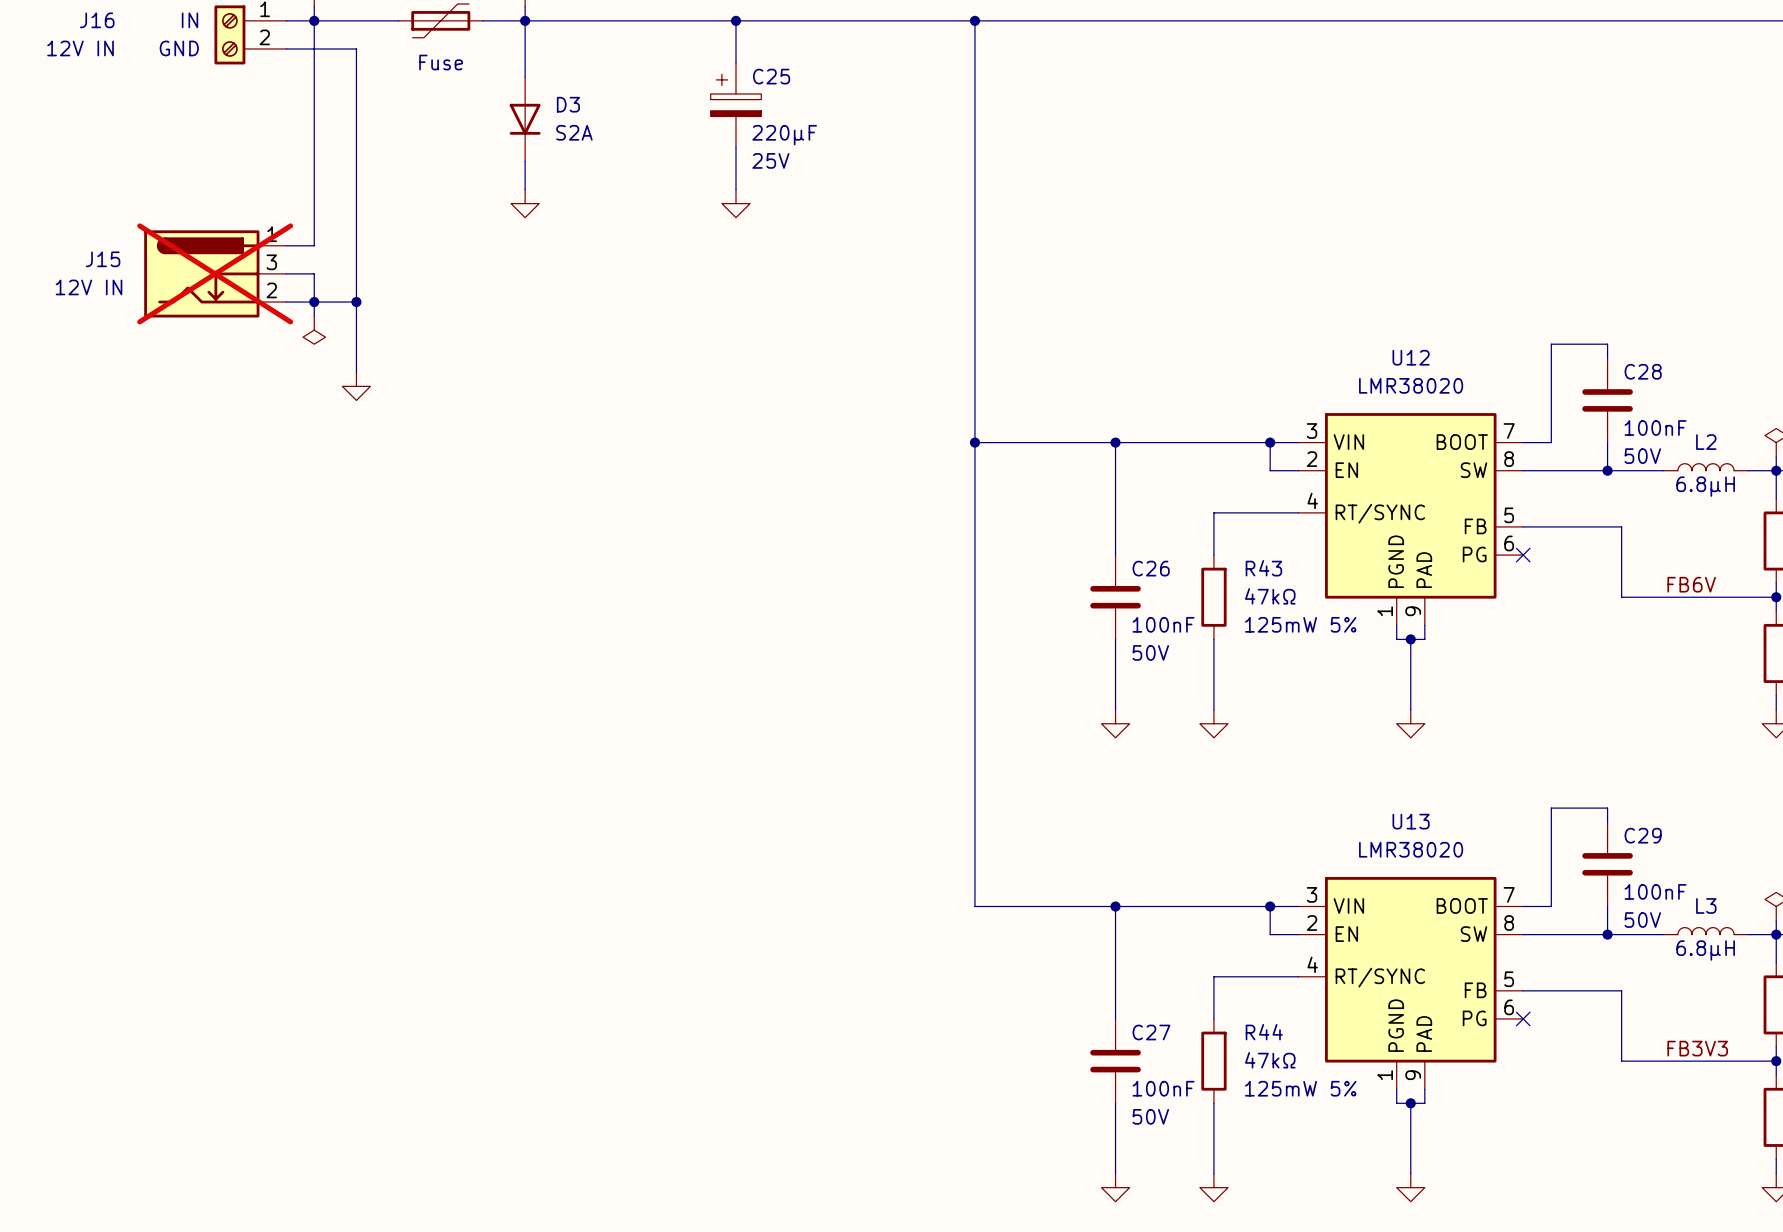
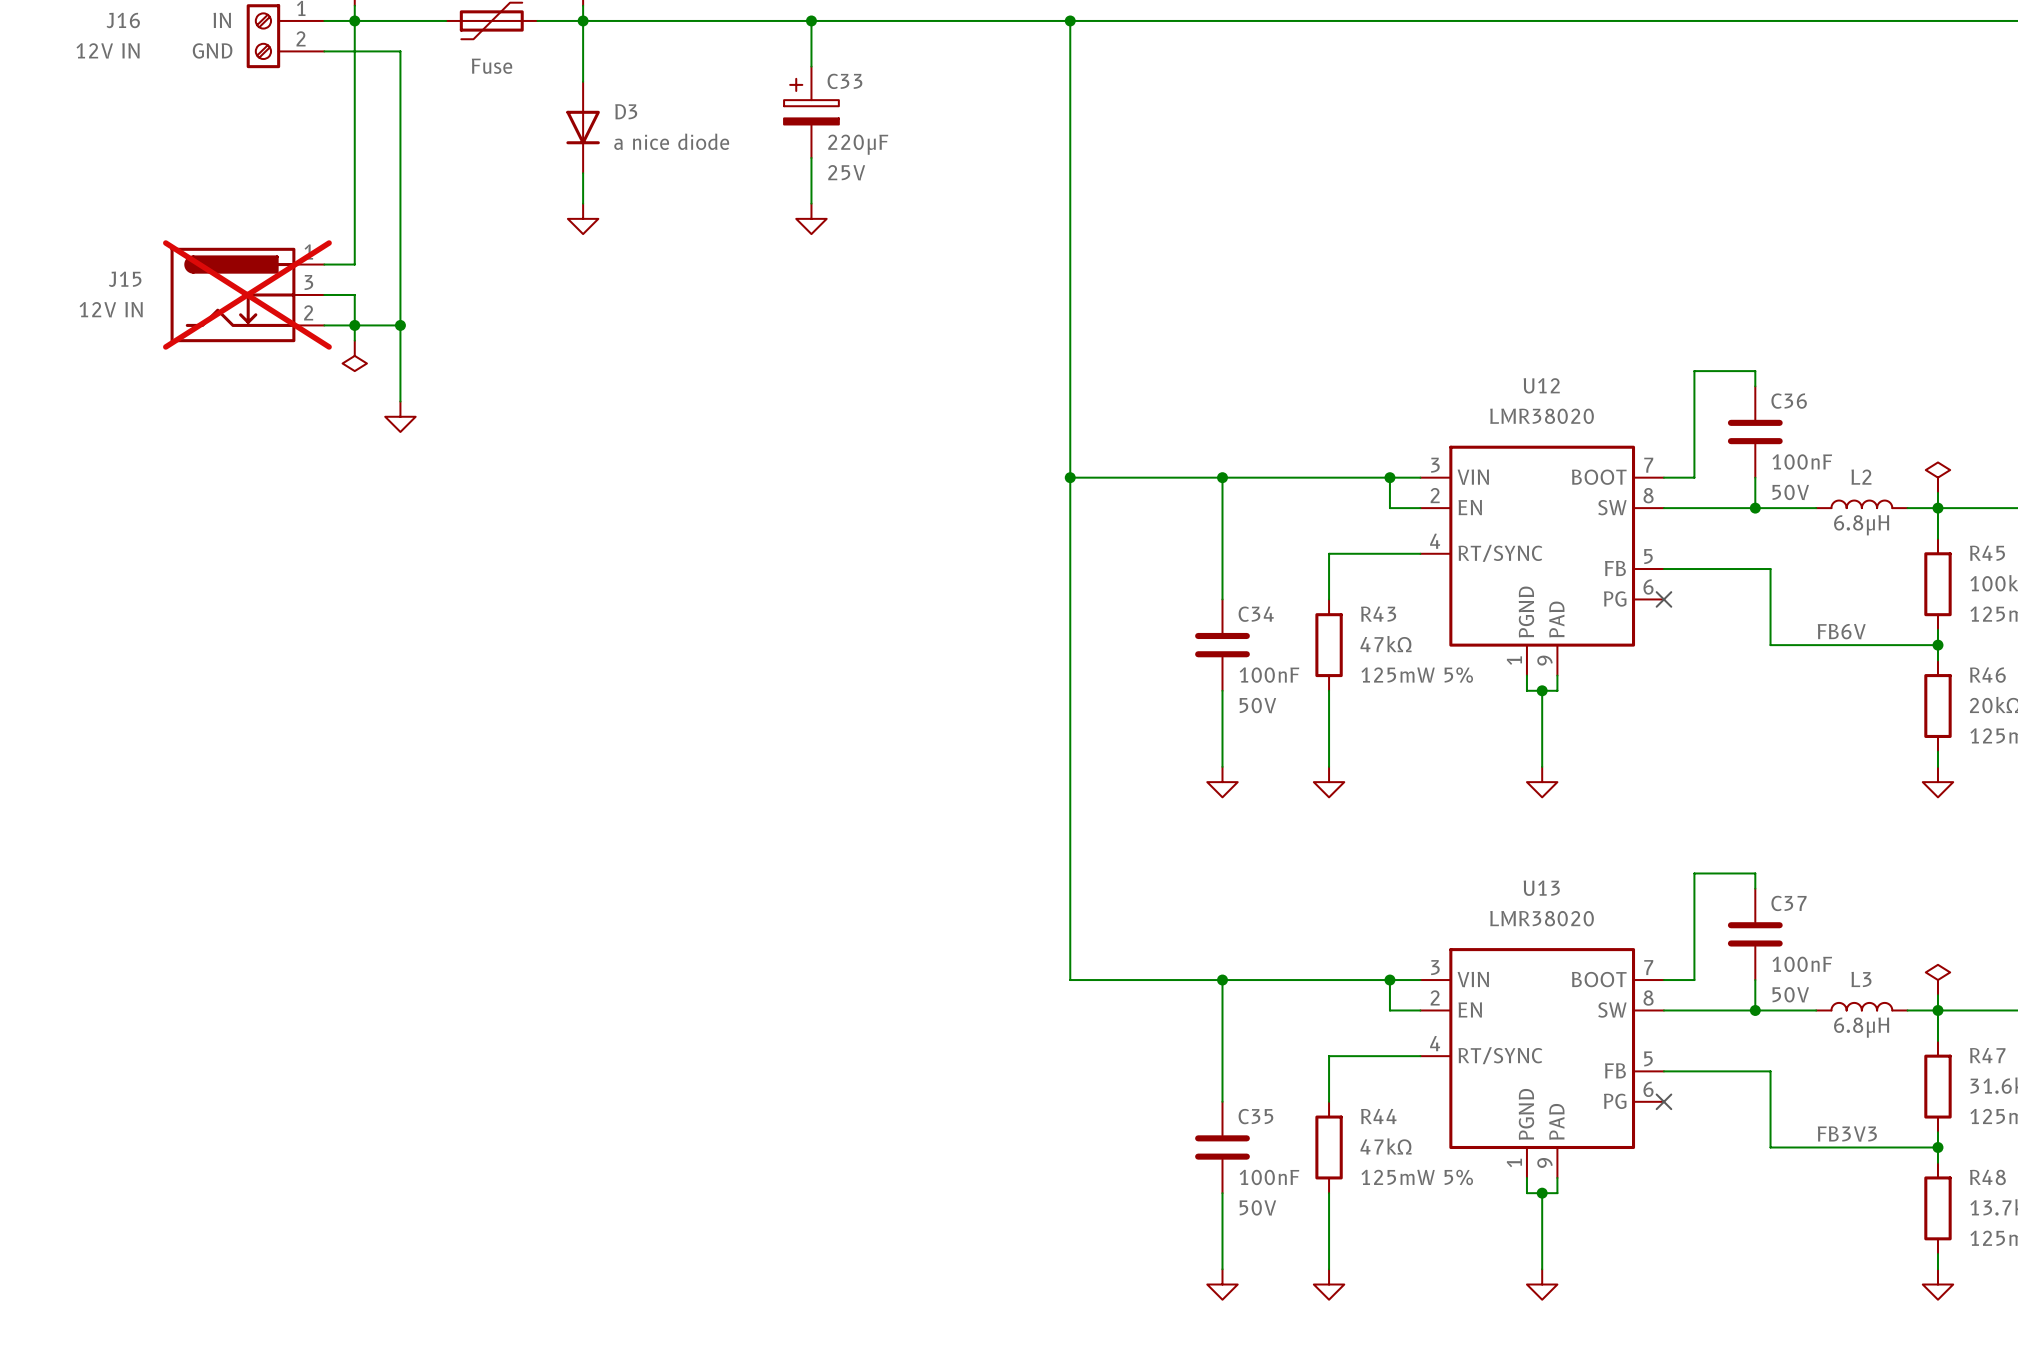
C25 name: C25 (771, 76) -> C33 (844, 81)
D3 value: S2A (574, 132) -> a nice diode (671, 141)
C28 name: C28 (1643, 371) -> C36 (1789, 401)
C26 name: C26 (1151, 568) -> C34 (1256, 614)
C29 name: C29 (1643, 835) -> C37 (1789, 903)
C27 name: C27 (1151, 1032) -> C35 (1255, 1116)

